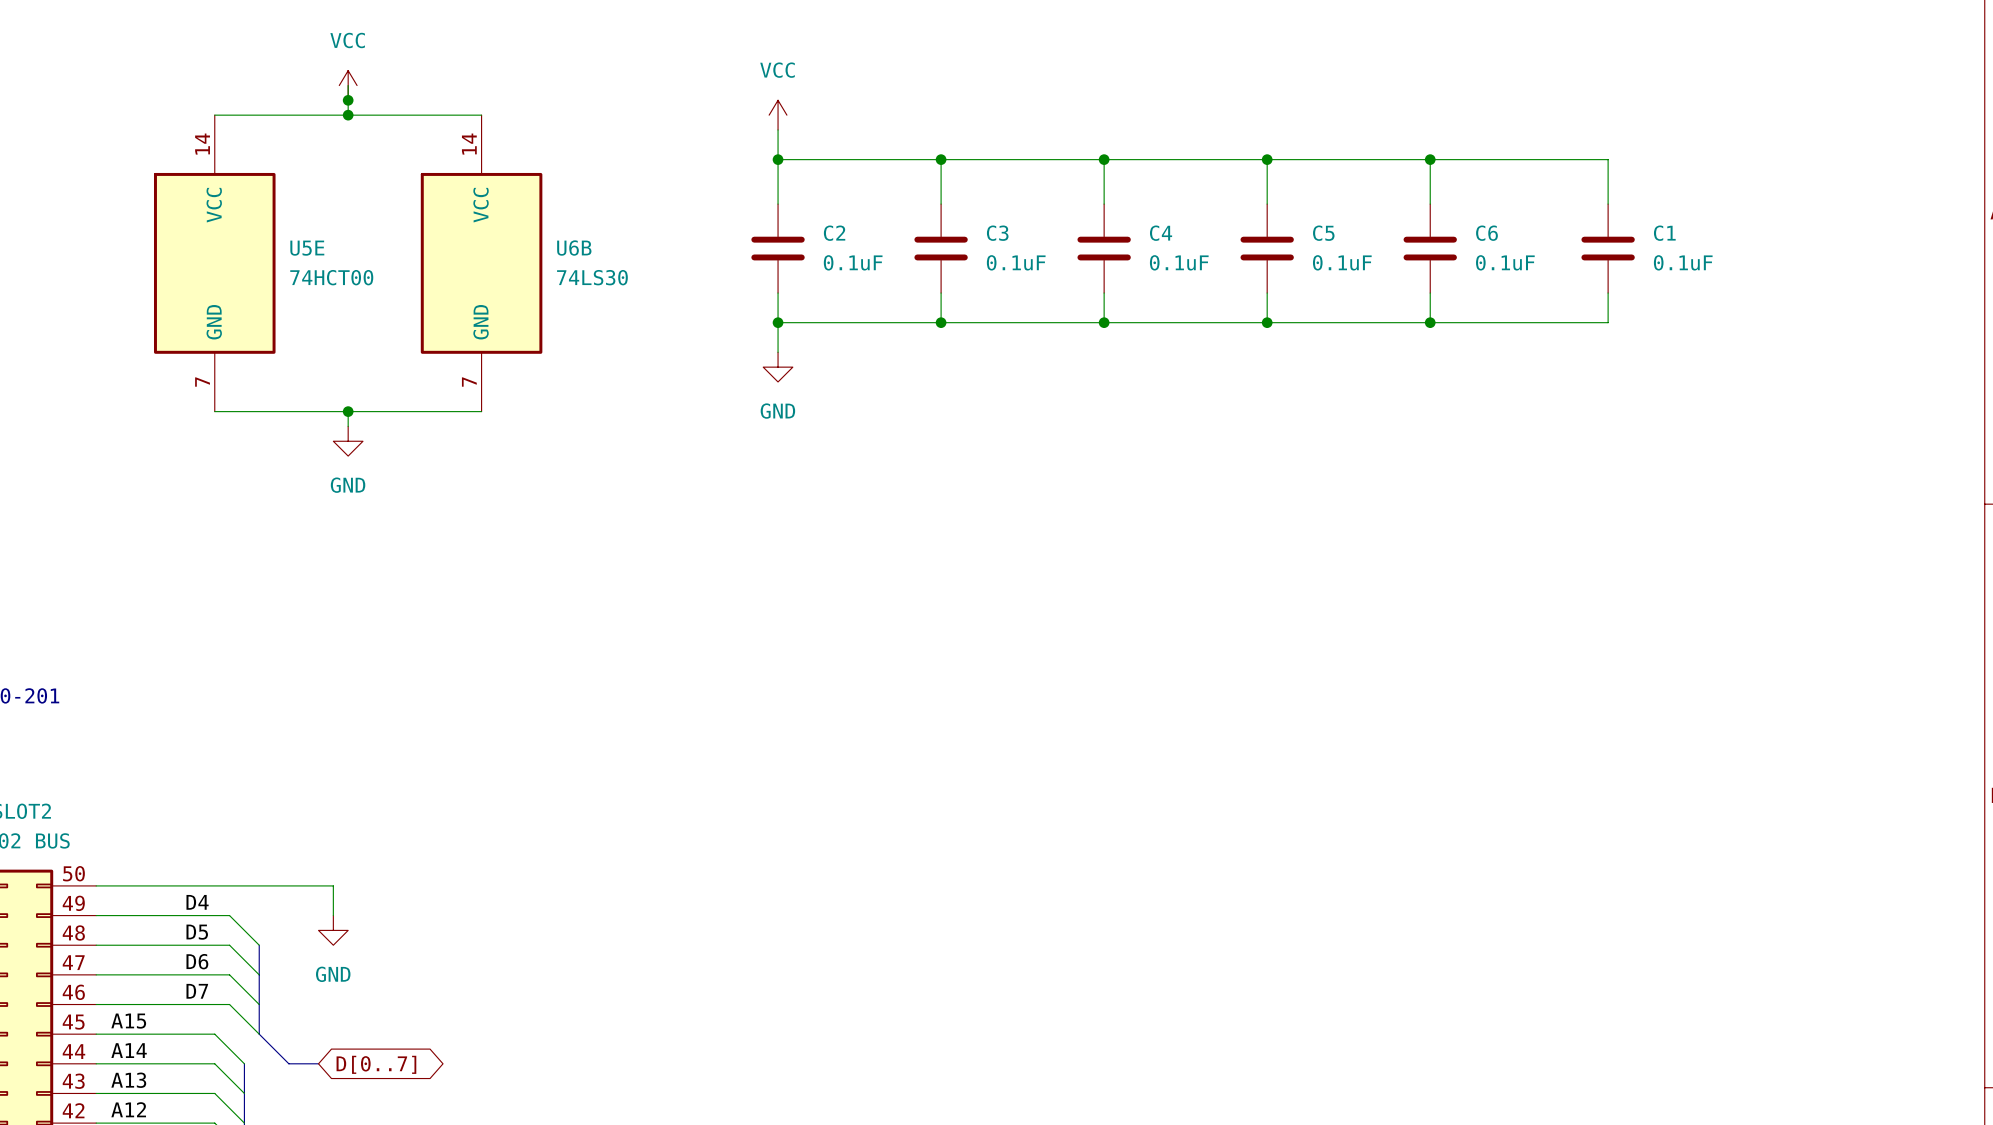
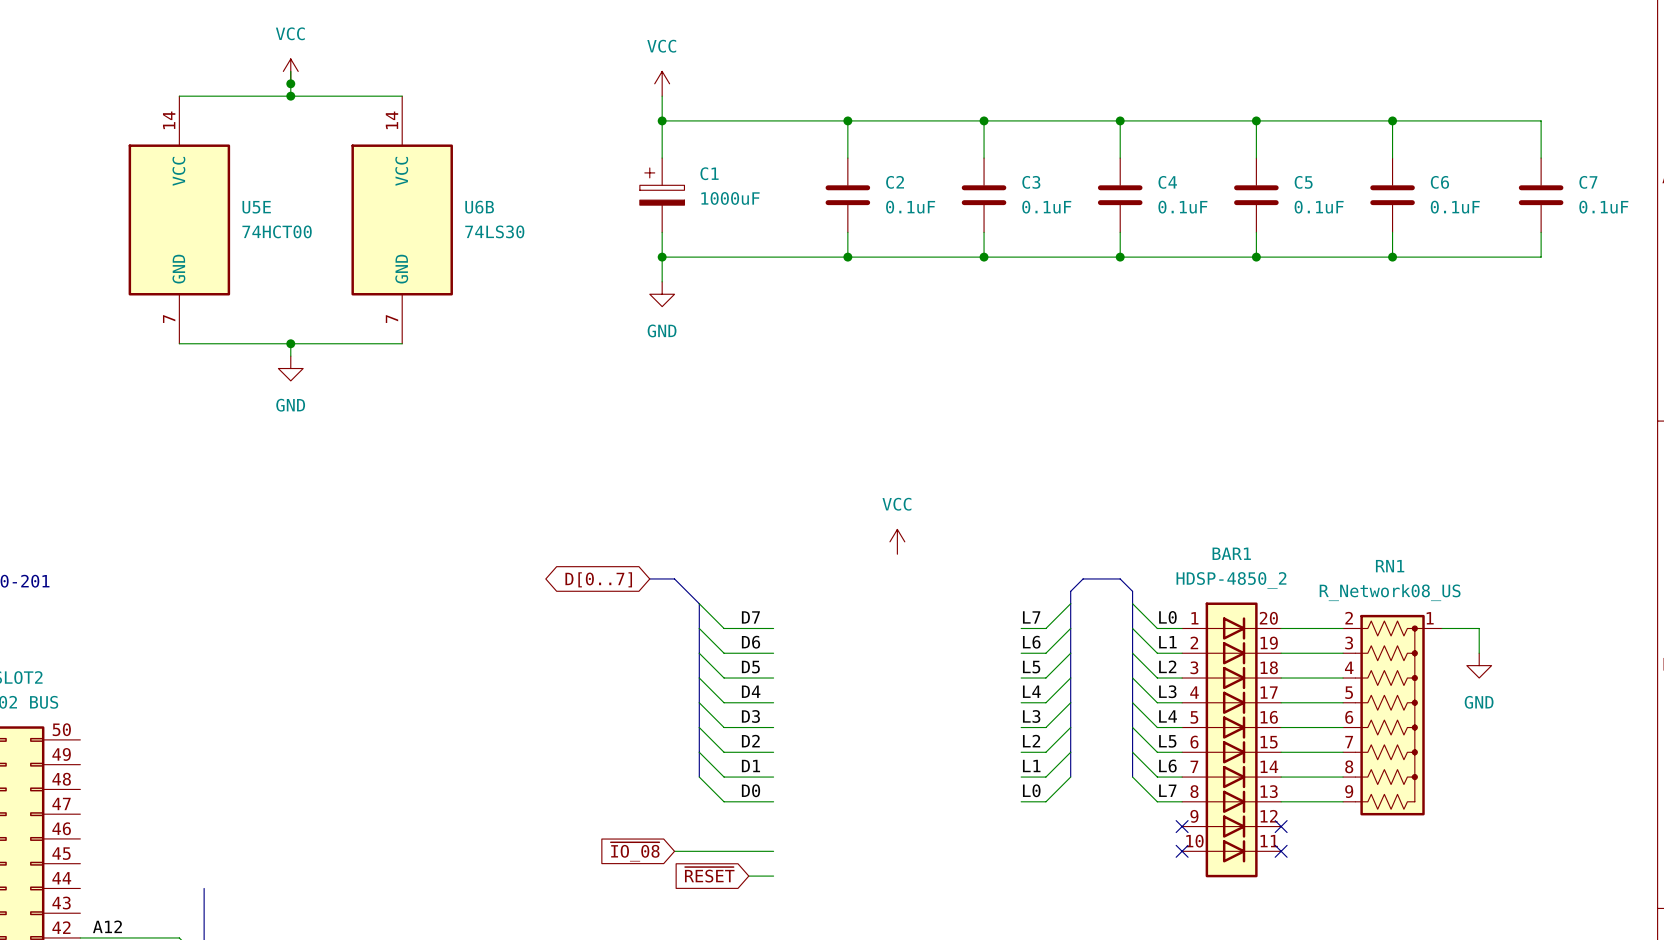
power symbol position: VCC (778, 115) -> VCC (662, 83)
wire: (778, 129) (778, 204) -> (662, 96) (662, 158)
wire: none -> (662, 120) (1541, 120) (1541, 158)
junction: none -> (847, 120)
junction: none -> (984, 120)
junction: none -> (1120, 120)
junction: none -> (1256, 120)
wire: none -> (1392, 120) (1392, 158)
junction: none -> (1392, 120)
wire: (778, 159) (1608, 159) (1608, 204) -> none
junction position: (778, 159) -> (662, 120)
wire: (941, 159) (941, 204) -> (847, 120) (847, 158)
junction: (941, 159) -> none
wire: (1104, 159) (1104, 204) -> (984, 120) (984, 158)
junction: (1104, 159) -> none
wire: (1267, 159) (1267, 204) -> (1120, 120) (1120, 158)
junction: (1267, 159) -> none
wire: (1430, 159) (1430, 204) -> (1256, 120) (1256, 158)
junction: (1430, 159) -> none
C1 symbol: [1581, 204, 1635, 294] -> [639, 158, 685, 233]
C7: none -> 0.1uF (1541, 195)
C2 position: (778, 248) -> (847, 195)
C3 position: (941, 248) -> (984, 195)
C4 position: (1104, 248) -> (1120, 195)
C5 position: (1267, 248) -> (1256, 195)
C6 position: (1430, 248) -> (1392, 195)
C1 value: 0.1uF (1683, 262) -> 1000uF (730, 198)
wire: none -> (1392, 232) (1392, 257)
wire: none -> (1541, 232) (1541, 257) (662, 257)
wire: (778, 293) (778, 352) -> (662, 232) (662, 281)
wire: (941, 293) (941, 322) -> (847, 232) (847, 257)
wire: (1104, 293) (1104, 322) -> (984, 232) (984, 257)
wire: (1267, 293) (1267, 322) -> (1120, 232) (1120, 257)
wire: (1430, 293) (1430, 322) -> (1256, 232) (1256, 257)
wire: (1608, 293) (1608, 322) (778, 322) -> none
junction: none -> (847, 257)
junction: none -> (984, 257)
junction: none -> (1120, 257)
junction: none -> (1256, 257)
junction: none -> (1392, 257)
junction position: (778, 322) -> (662, 257)
junction: (941, 322) -> none
junction: (1104, 322) -> none
junction: (1267, 322) -> none
junction: (1430, 322) -> none
power symbol position: GND (778, 367) -> GND (662, 294)
power symbol: none -> VCC (897, 541)
bus: none -> (649, 578) (674, 578) (699, 603) (699, 777)
global label: none -> D[0..7] (598, 579)
wire: none -> (699, 603) (724, 628) (773, 628)
wire: none -> (1070, 603) (1045, 628) (1021, 628)
wire: none -> (1132, 603) (1157, 628) (1182, 628)
label: none -> D7 (750, 617)
label: none -> L7 (1031, 617)
label: none -> L0 (1167, 617)
wire: none -> (699, 628) (724, 653) (773, 653)
wire: none -> (1070, 628) (1045, 653) (1021, 653)
wire: none -> (1132, 628) (1157, 653) (1182, 653)
wire: none -> (1281, 628) (1343, 628)
wire: none -> (1442, 628) (1479, 628) (1479, 653)
label: none -> D6 (751, 642)
label: none -> L6 (1031, 642)
label: none -> L1 (1167, 642)
wire: none -> (699, 653) (724, 678) (773, 678)
wire: none -> (1070, 653) (1045, 678) (1021, 678)
wire: none -> (1132, 653) (1157, 678) (1182, 678)
wire: none -> (1281, 653) (1343, 653)
power symbol: none -> GND (1479, 665)
label: none -> D5 (750, 667)
label: none -> L5 (1031, 667)
label: none -> L2 (1167, 666)
wire: none -> (699, 678) (724, 702) (773, 702)
wire: none -> (1070, 678) (1045, 702) (1021, 702)
wire: none -> (1132, 678) (1157, 702) (1182, 702)
wire: none -> (1281, 678) (1343, 678)
label: none -> D4 (751, 691)
label: none -> L4 (1031, 691)
label: none -> L3 (1167, 691)
wire: none -> (699, 702) (724, 727) (773, 727)
wire: none -> (1070, 702) (1045, 727) (1021, 727)
wire: none -> (1132, 702) (1157, 727) (1182, 727)
wire: none -> (1281, 702) (1343, 702)
RN1: none -> R_Network08_US (1392, 715)
label: none -> D3 (750, 716)
label: none -> L3 (1031, 716)
label: none -> L4 (1168, 716)
wire: none -> (699, 727) (724, 752) (773, 752)
wire: none -> (1070, 727) (1045, 752) (1021, 752)
wire: none -> (1132, 727) (1157, 752) (1182, 752)
wire: none -> (1281, 727) (1343, 727)
wire: (96, 885) (333, 885) (333, 915) -> none
BAR1: none -> HDSP-4850_2 (1231, 739)
label: none -> D2 (750, 741)
label: none -> L2 (1031, 741)
label: none -> L5 (1167, 741)
wire: none -> (699, 752) (724, 777) (773, 777)
wire: none -> (1070, 752) (1045, 777) (1021, 777)
wire: none -> (1132, 752) (1157, 777) (1182, 777)
wire: none -> (1281, 752) (1343, 752)
label: D4 (197, 902) -> none
wire: (96, 915) (229, 915) (259, 945) -> none
label: none -> D1 (750, 766)
label: none -> L1 (1031, 766)
label: none -> L6 (1167, 766)
power symbol: GND (333, 930) -> none
wire: none -> (699, 777) (724, 801) (773, 801)
wire: none -> (1070, 777) (1045, 801) (1021, 801)
bus: none -> (1070, 777) (1070, 591) (1083, 578) (1120, 578) (1132, 591) (1132, 777)
wire: none -> (1132, 777) (1157, 801) (1182, 801)
wire: none -> (1281, 777) (1343, 777)
label: D5 (197, 932) -> none
wire: (96, 945) (229, 945) (259, 974) -> none
bus: (259, 945) (259, 1034) (288, 1063) (318, 1063) -> none
label: none -> D0 (751, 790)
label: none -> L0 (1031, 790)
label: none -> L7 (1167, 790)
wire: none -> (1281, 801) (1343, 801)
label: D6 (197, 961) -> none
wire: (96, 974) (229, 974) (259, 1004) -> none
no-connect mark: none -> (1182, 826)
no-connect mark: none -> (1281, 826)
label: D7 (197, 991) -> none
wire: (96, 1004) (229, 1004) (259, 1034) -> none
wire: none -> (674, 851) (773, 851)
no-connect mark: none -> (1182, 851)
no-connect mark: none -> (1281, 851)
global label: none -> ~{IO_08} (635, 851)
label: A15 (128, 1021) -> none
wire: (96, 1034) (214, 1034) (244, 1063) -> none
global label: none -> ~{RESET} (709, 874)
wire: none -> (748, 876) (773, 876)
label: A14 (129, 1050) -> none
wire: (96, 1063) (214, 1063) (244, 1093) -> none
global label: D[0..7] (376, 1064) -> none
label: A13 (128, 1080) -> none
wire: (96, 1093) (214, 1093) (244, 1123) -> none

